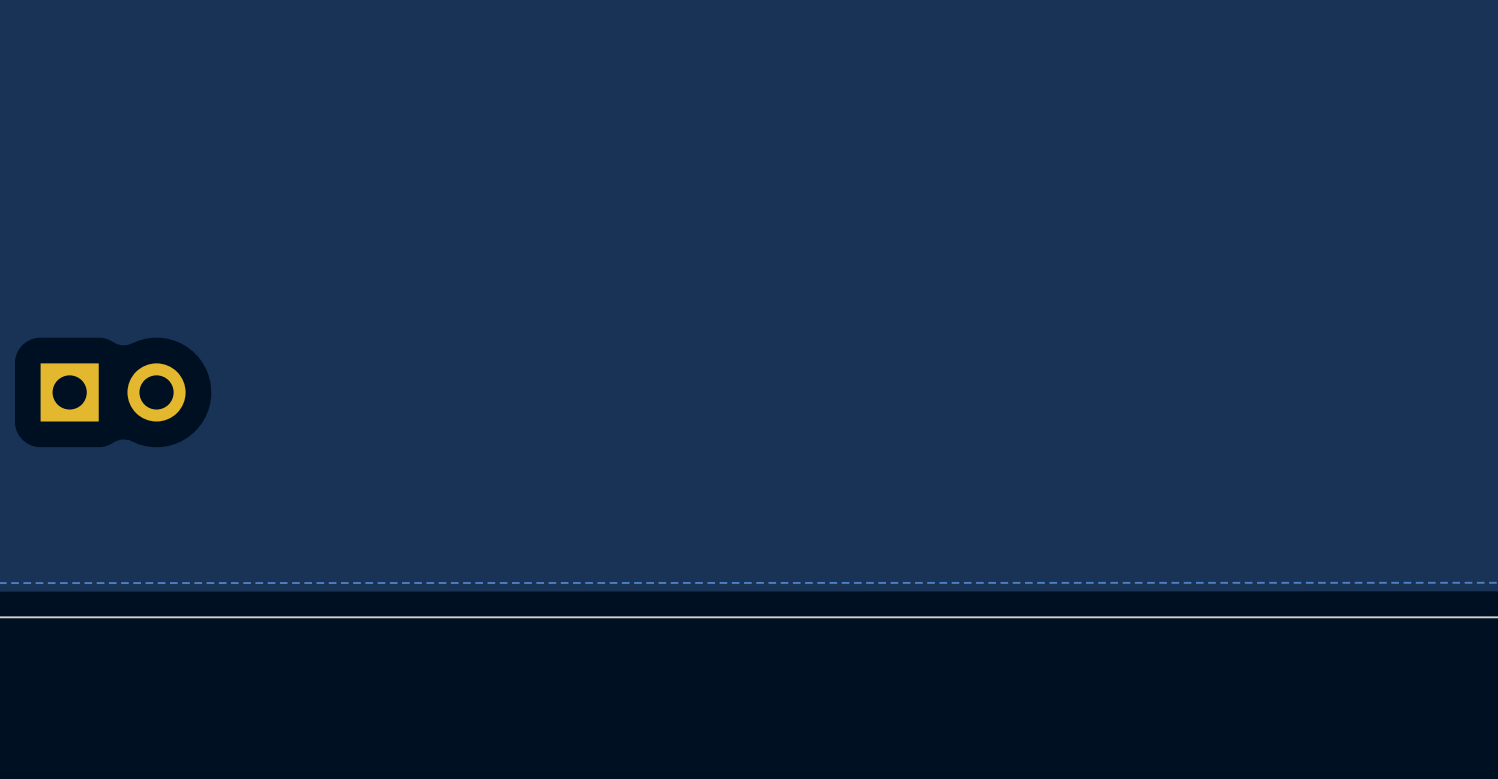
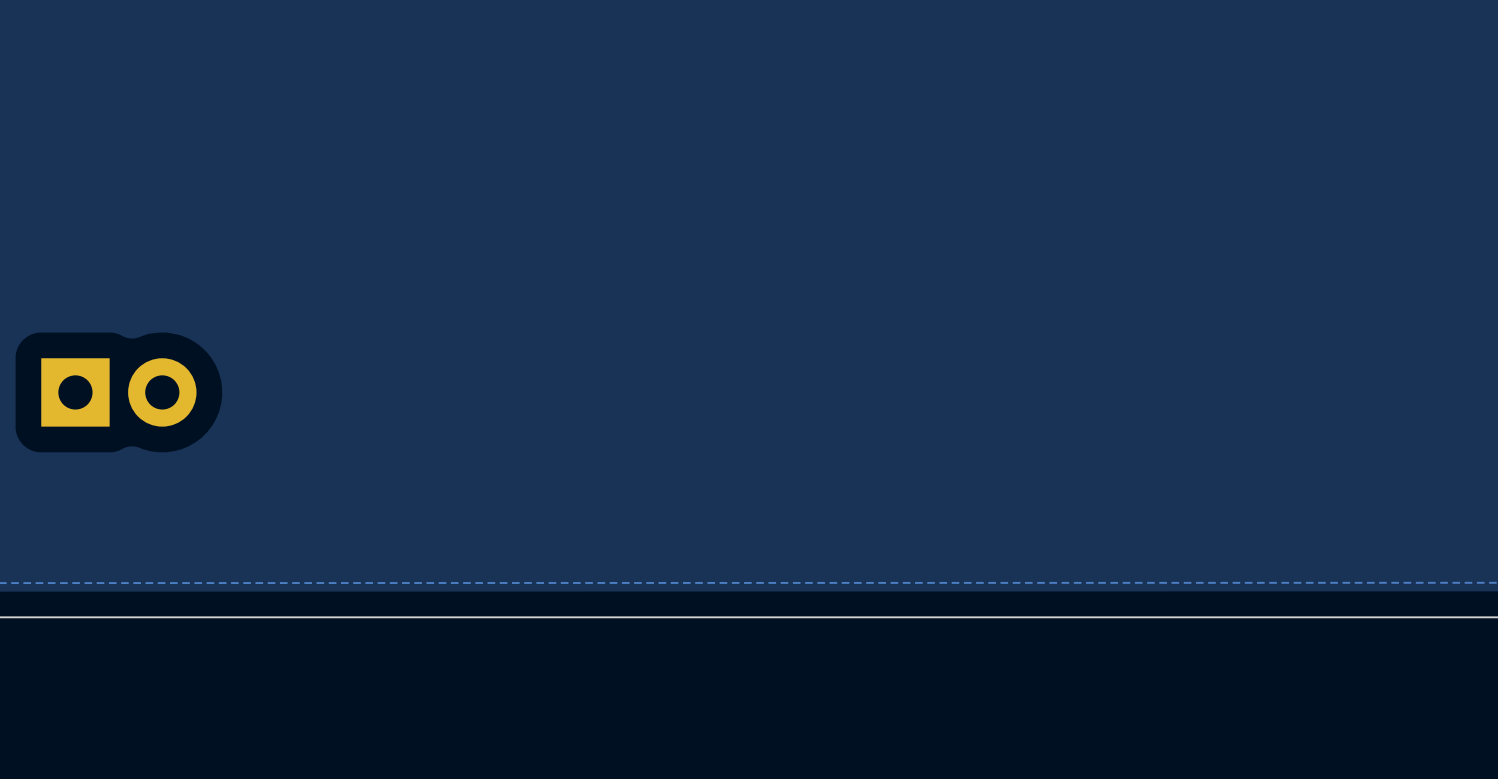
part footprint: [40, 363, 186, 422] -> [41, 358, 197, 427]

